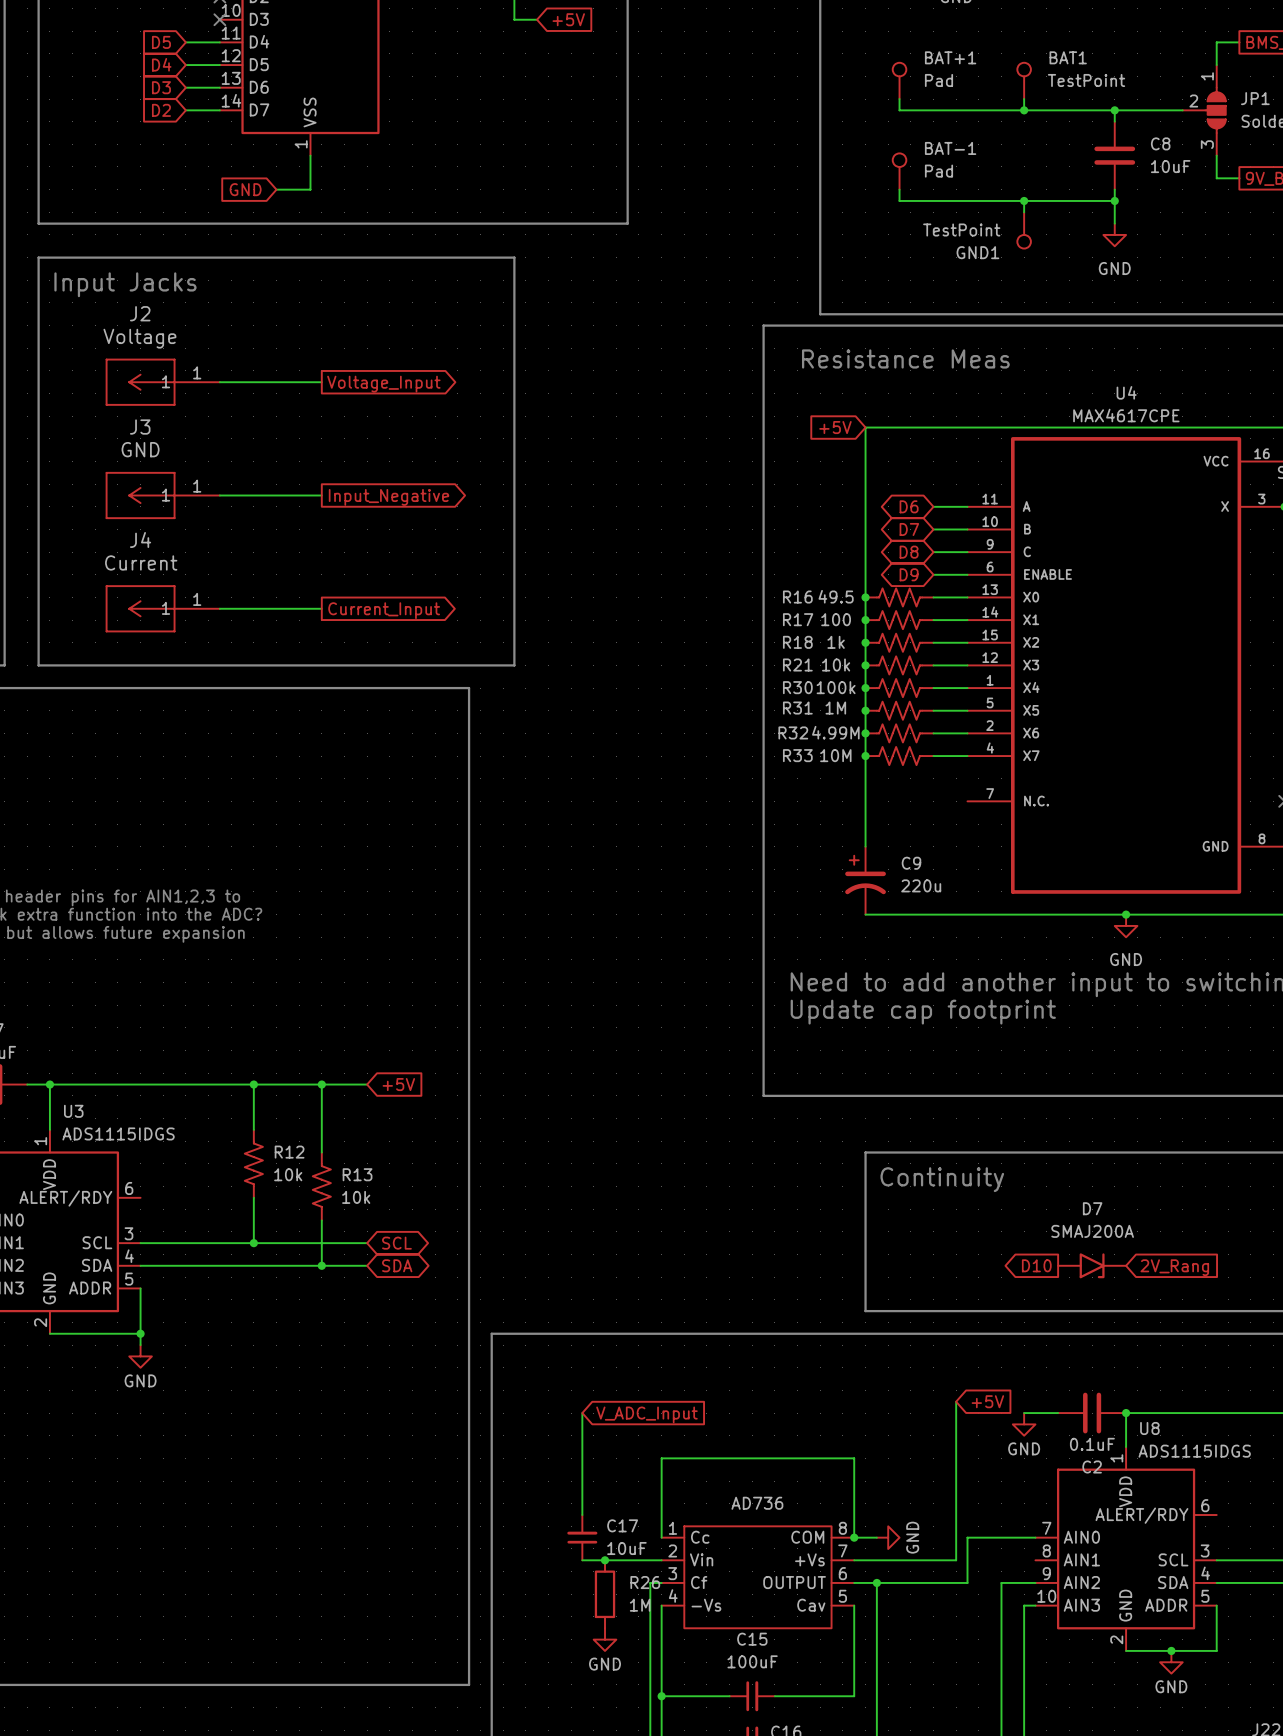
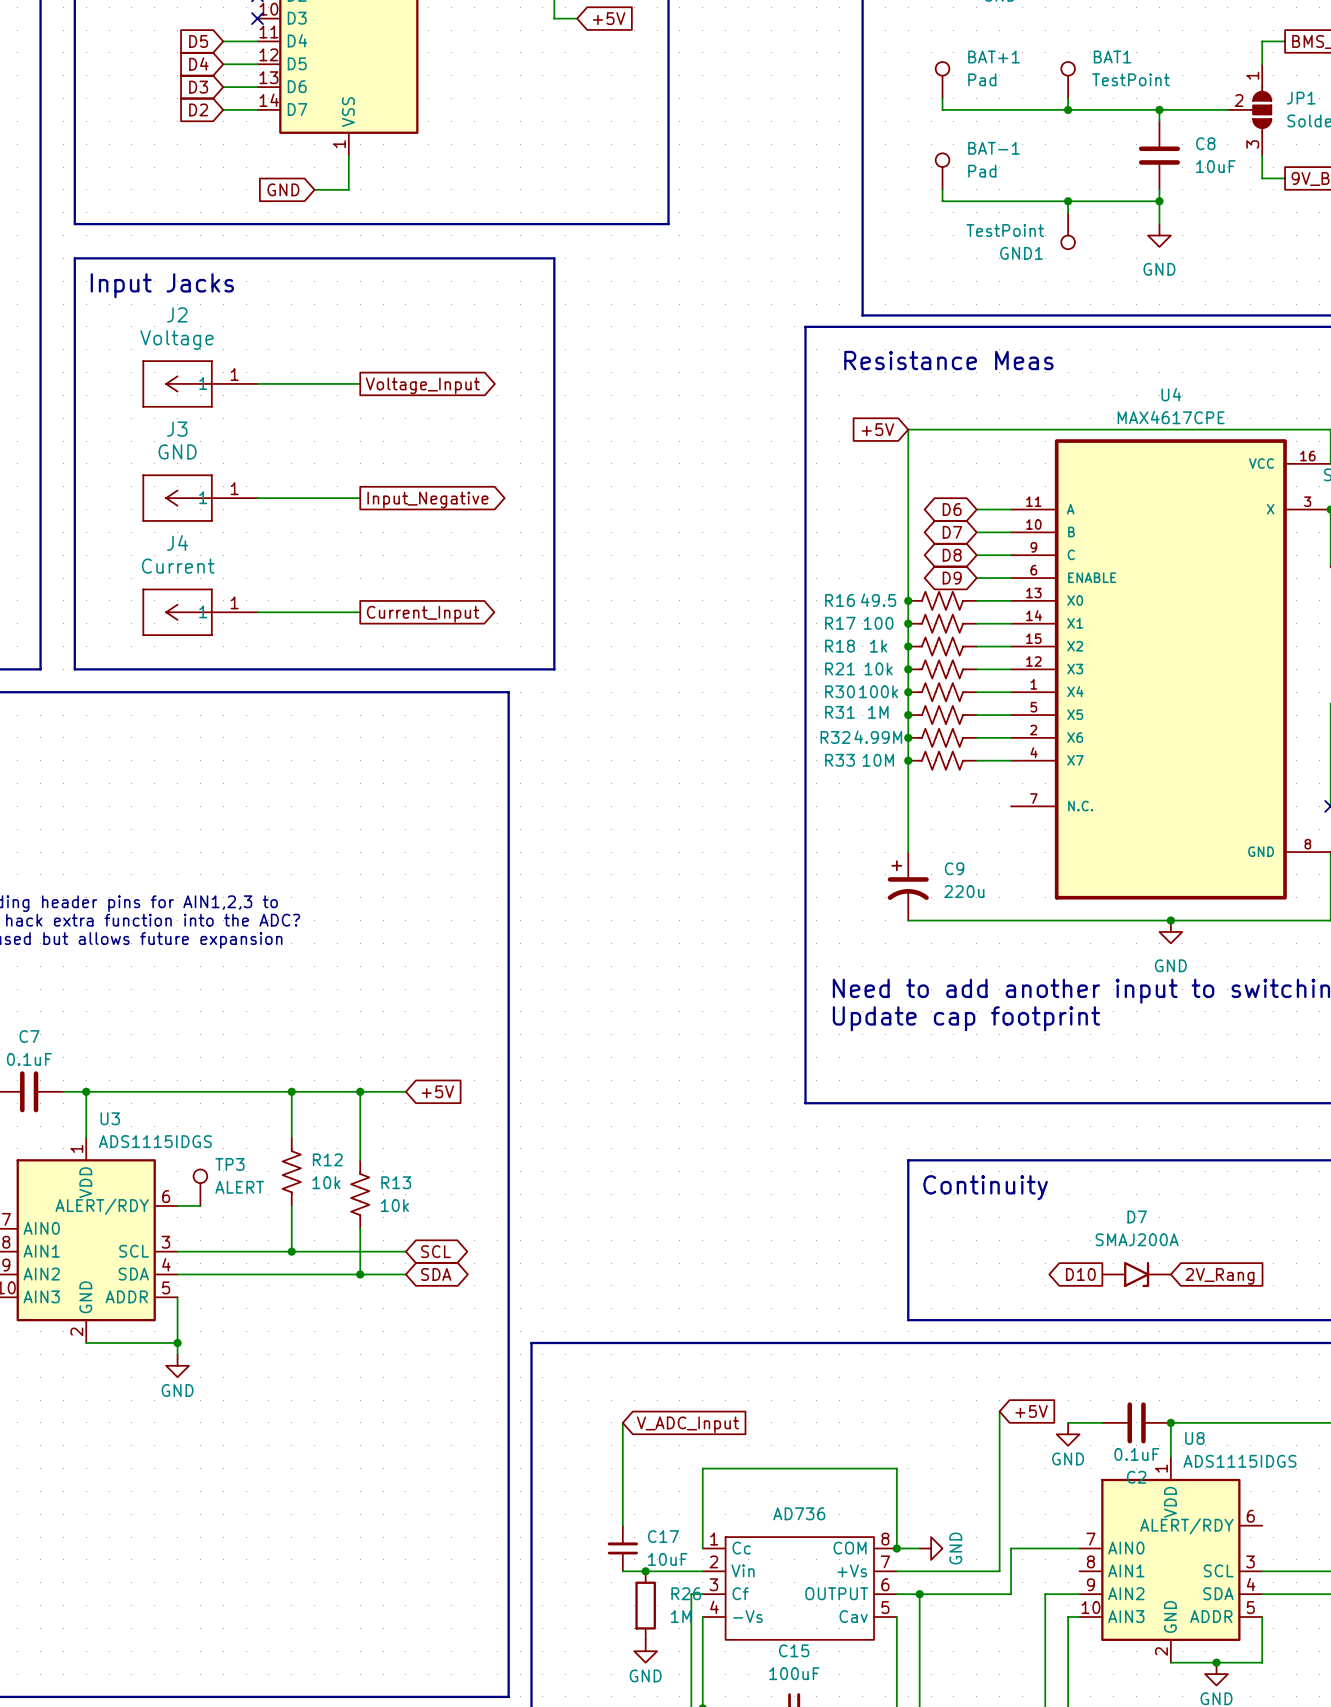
TP3: none -> ALERT (200, 1187)
wire: none -> (177, 1205) (200, 1205)

